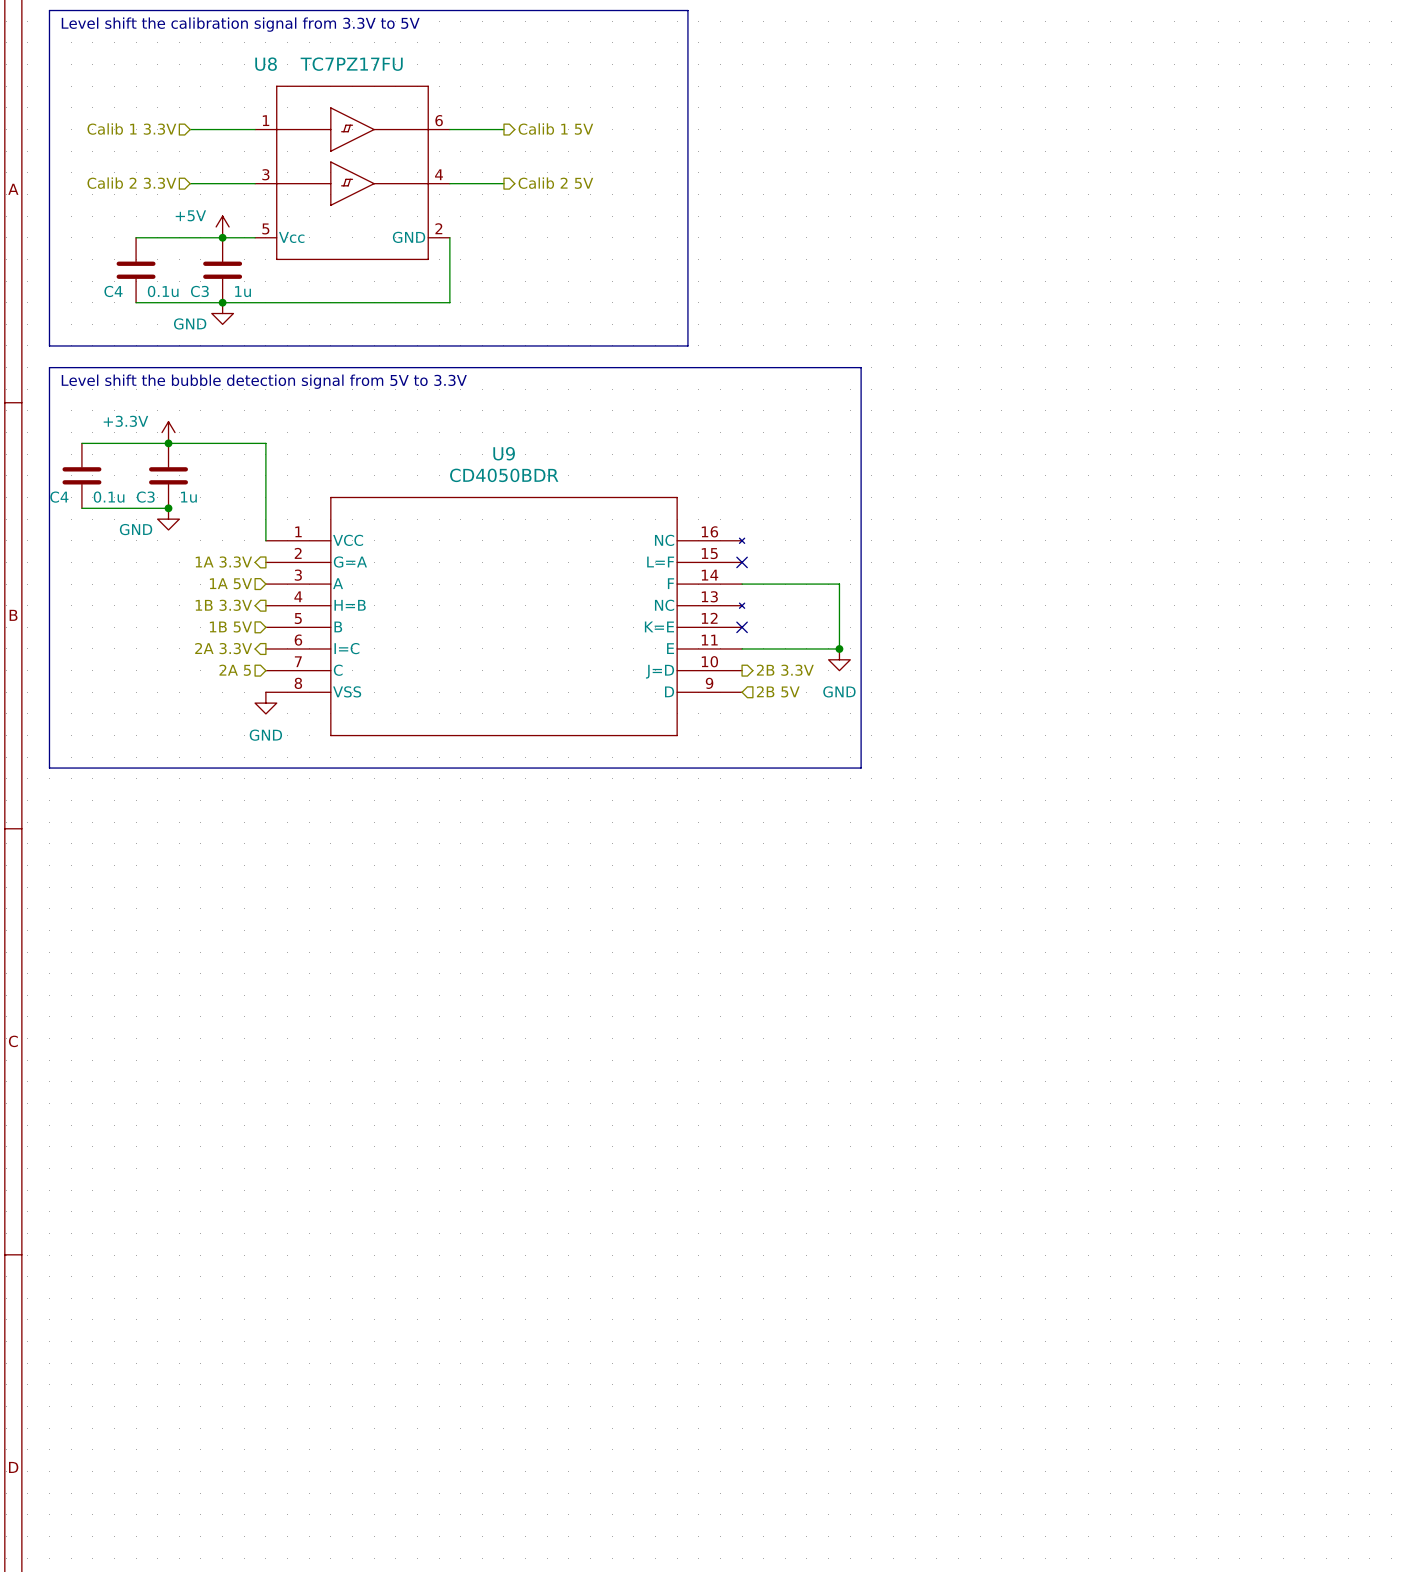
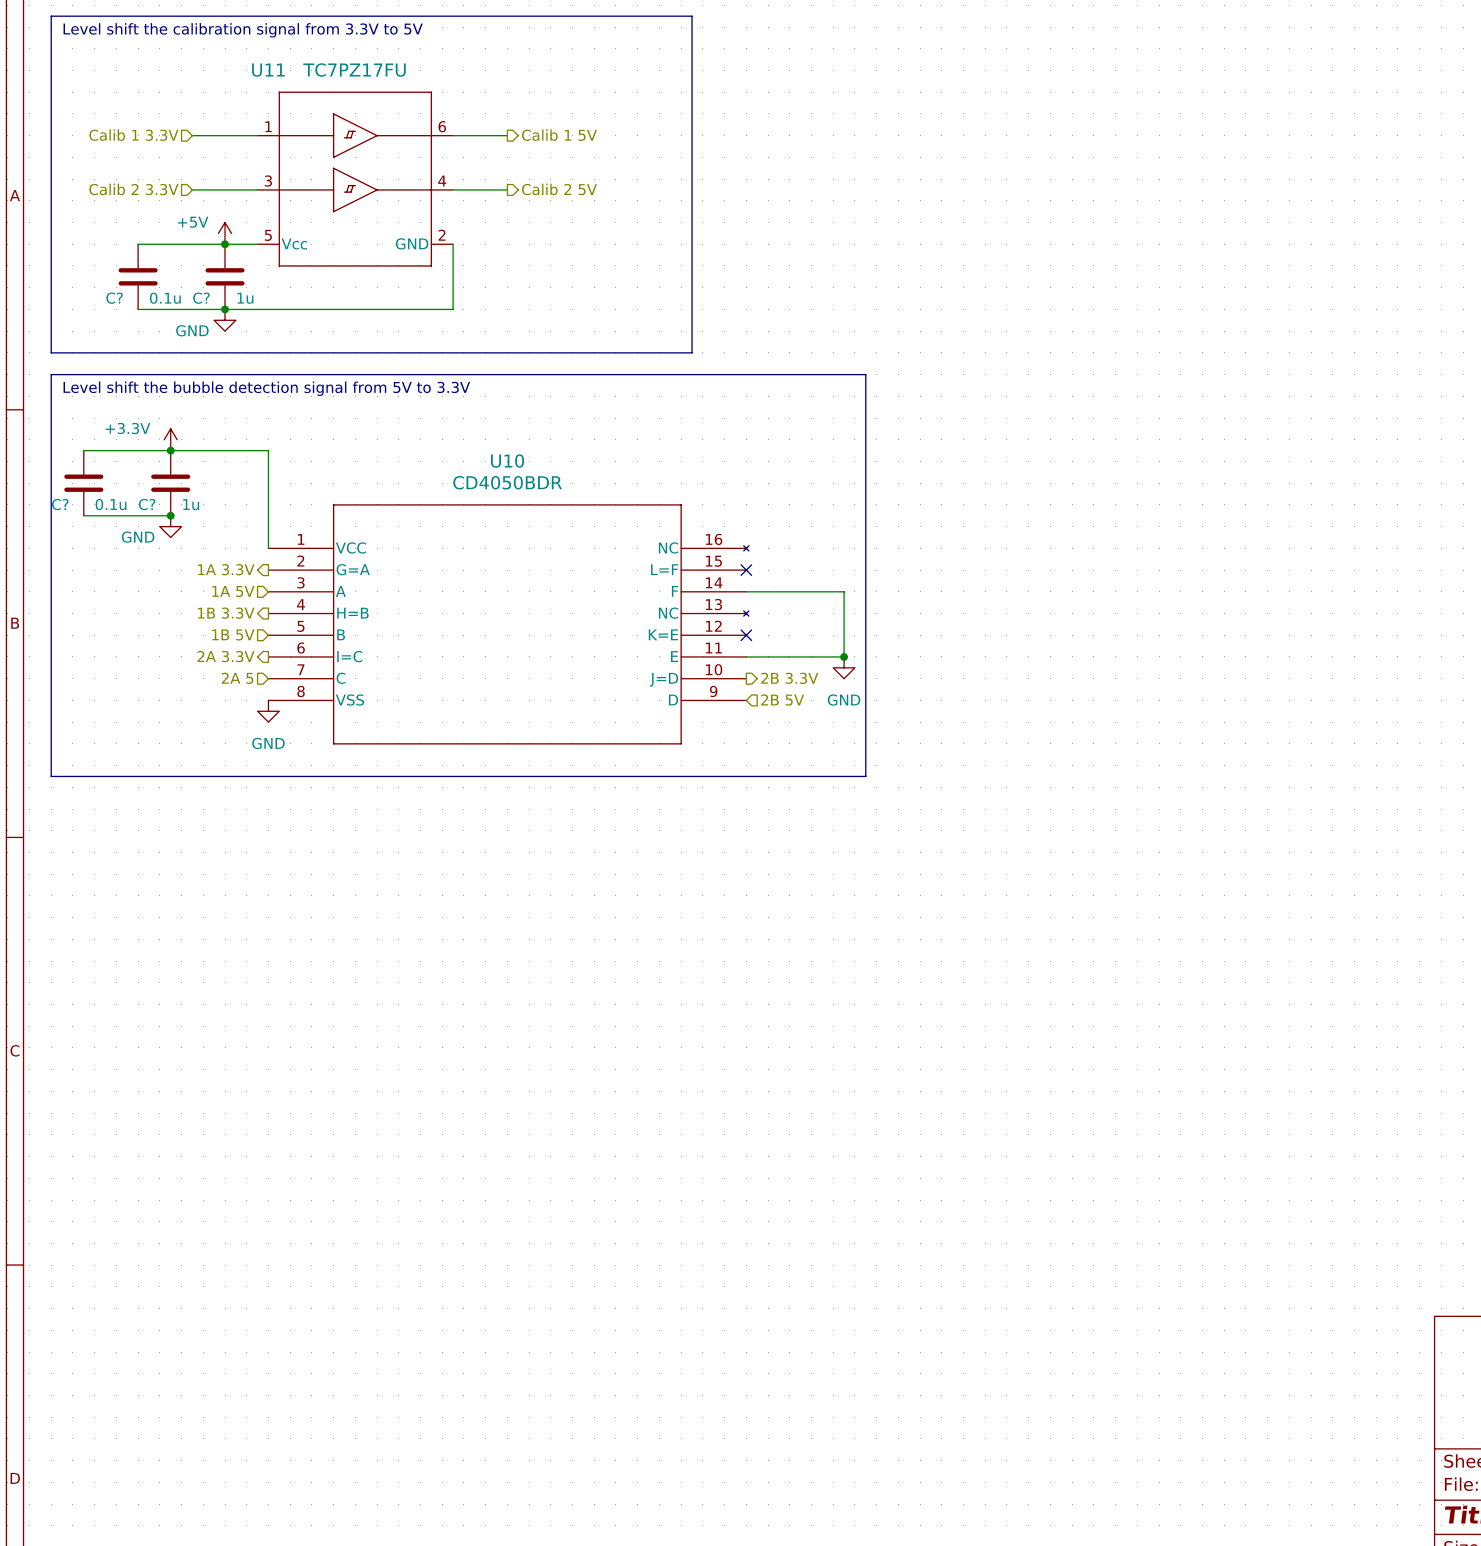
U8 name: U8 (266, 64) -> U11 (268, 70)
C4 name: C4 (113, 291) -> C? (114, 298)
C3 name: C3 (199, 291) -> C? (201, 298)
U9 name: U9 (504, 453) -> U10 (507, 461)
C4 name: C4 (59, 497) -> C? (60, 504)
C3 name: C3 (145, 497) -> C? (147, 504)

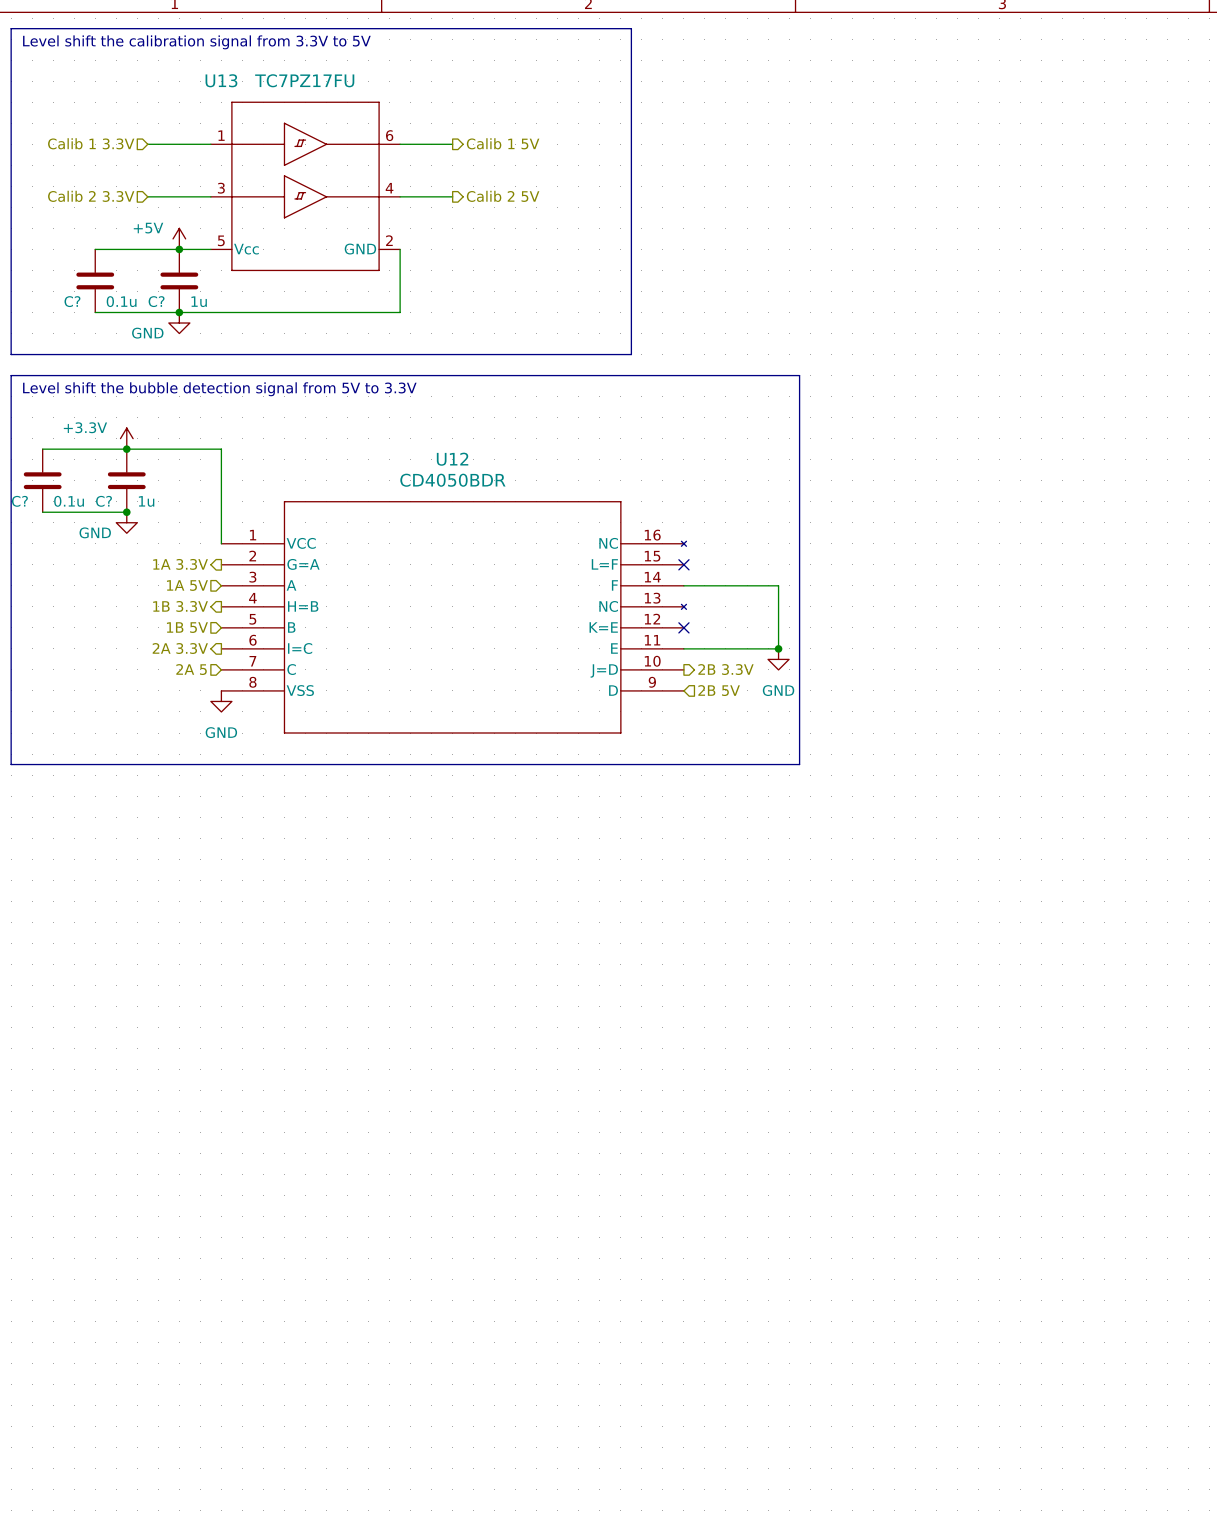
U11 name: U11 (268, 70) -> U13 (221, 80)
U10 name: U10 (507, 461) -> U12 (452, 459)

